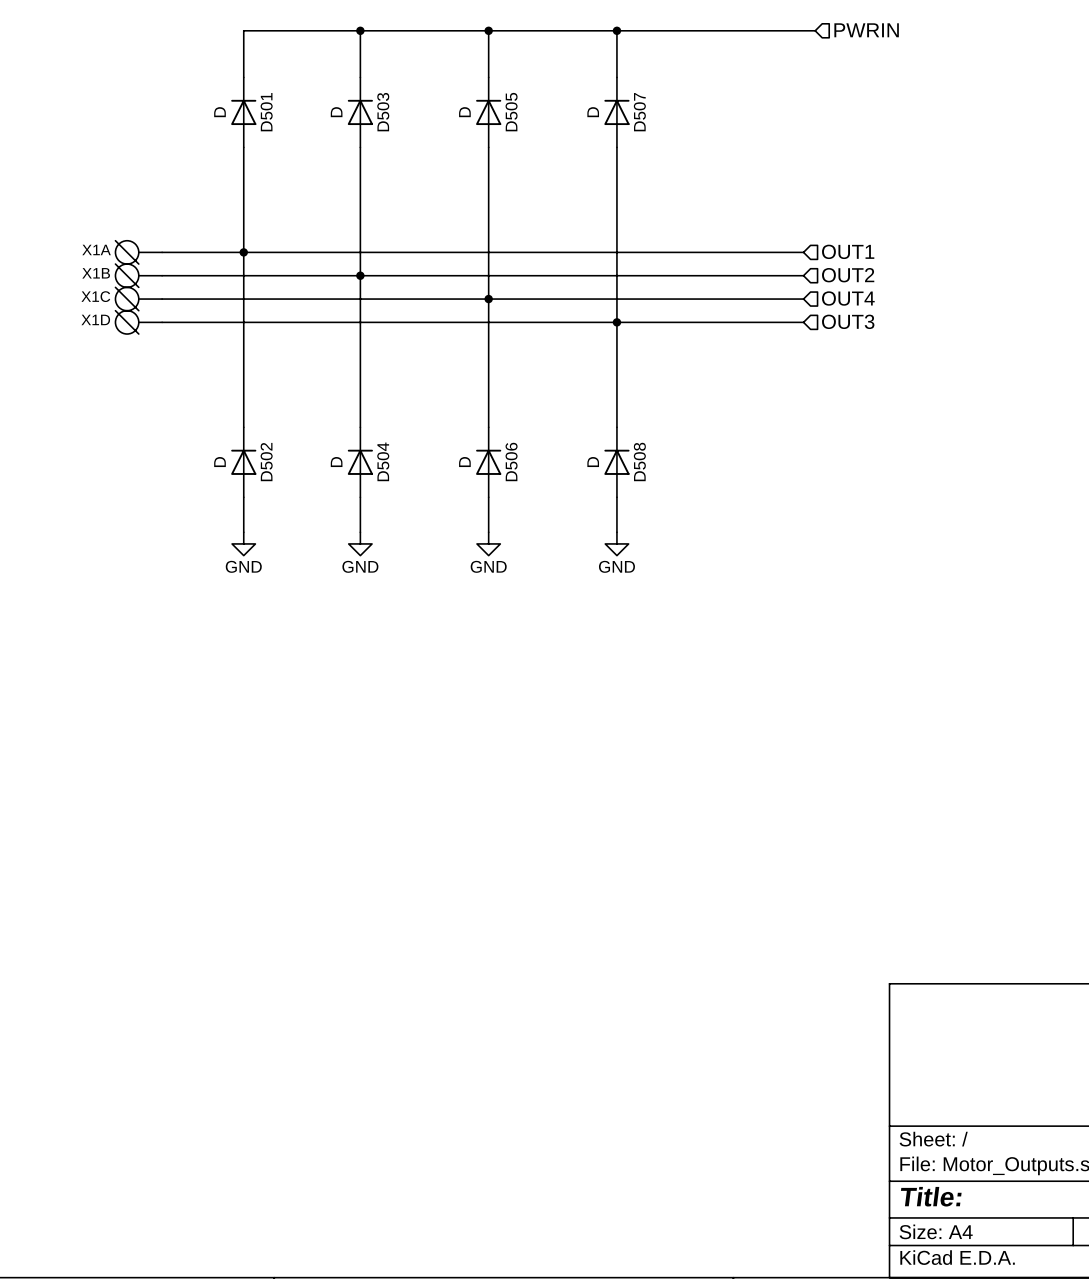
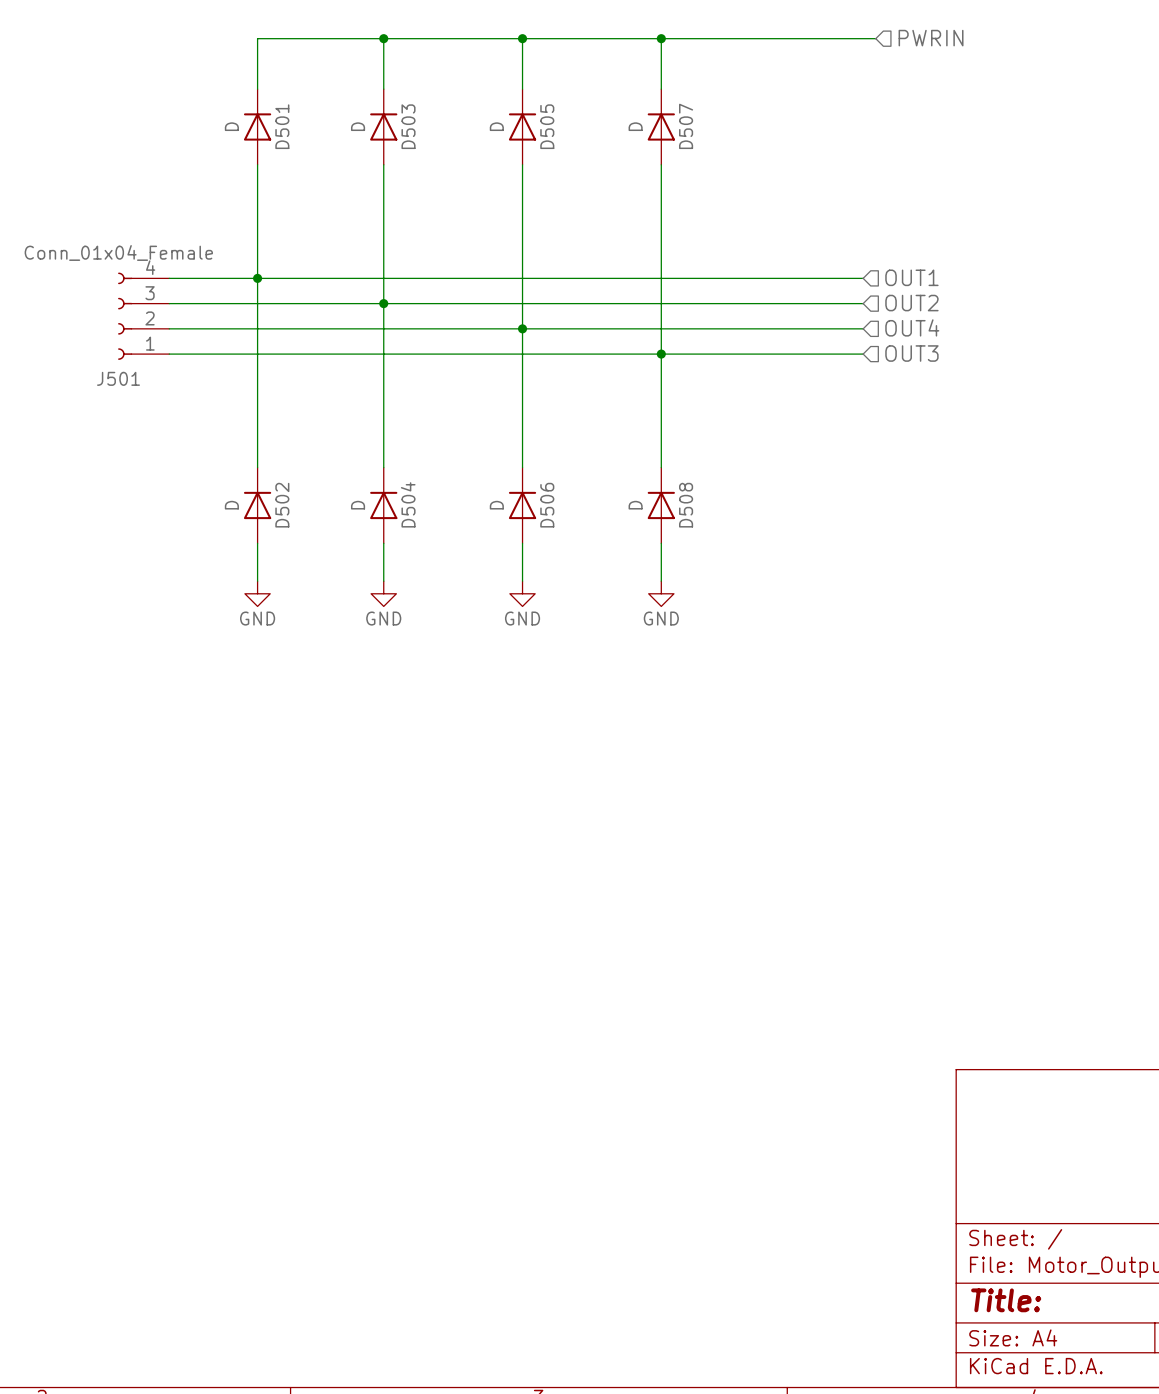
X1A: (138, 252) -> none
X1B: (138, 275) -> none
J501: none -> Conn_01x04_Female (143, 316)
X1C: (138, 299) -> none
X1D: (138, 322) -> none

